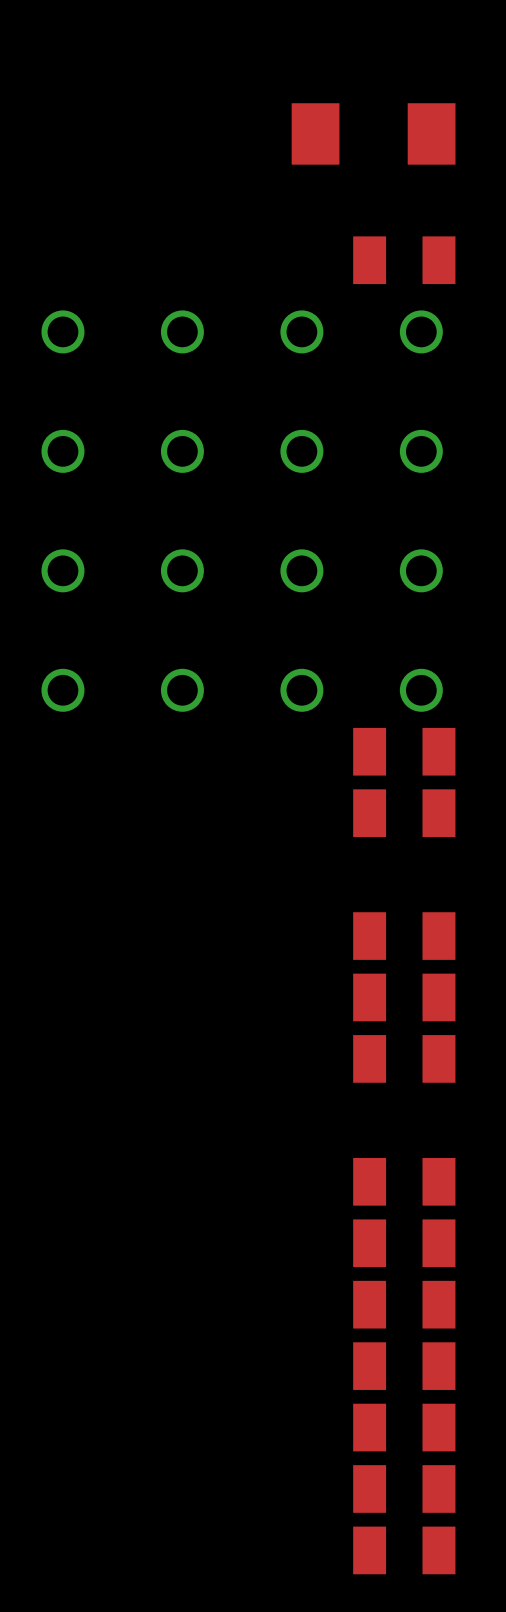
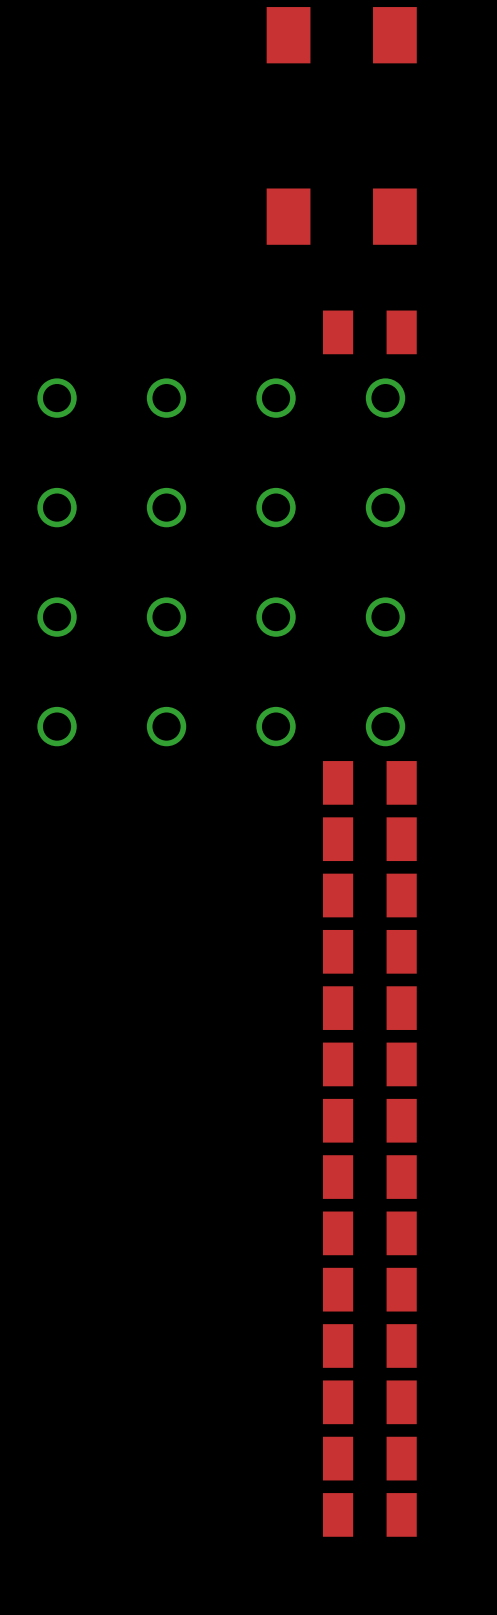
part: none -> (369, 895)
part: none -> (369, 1120)

